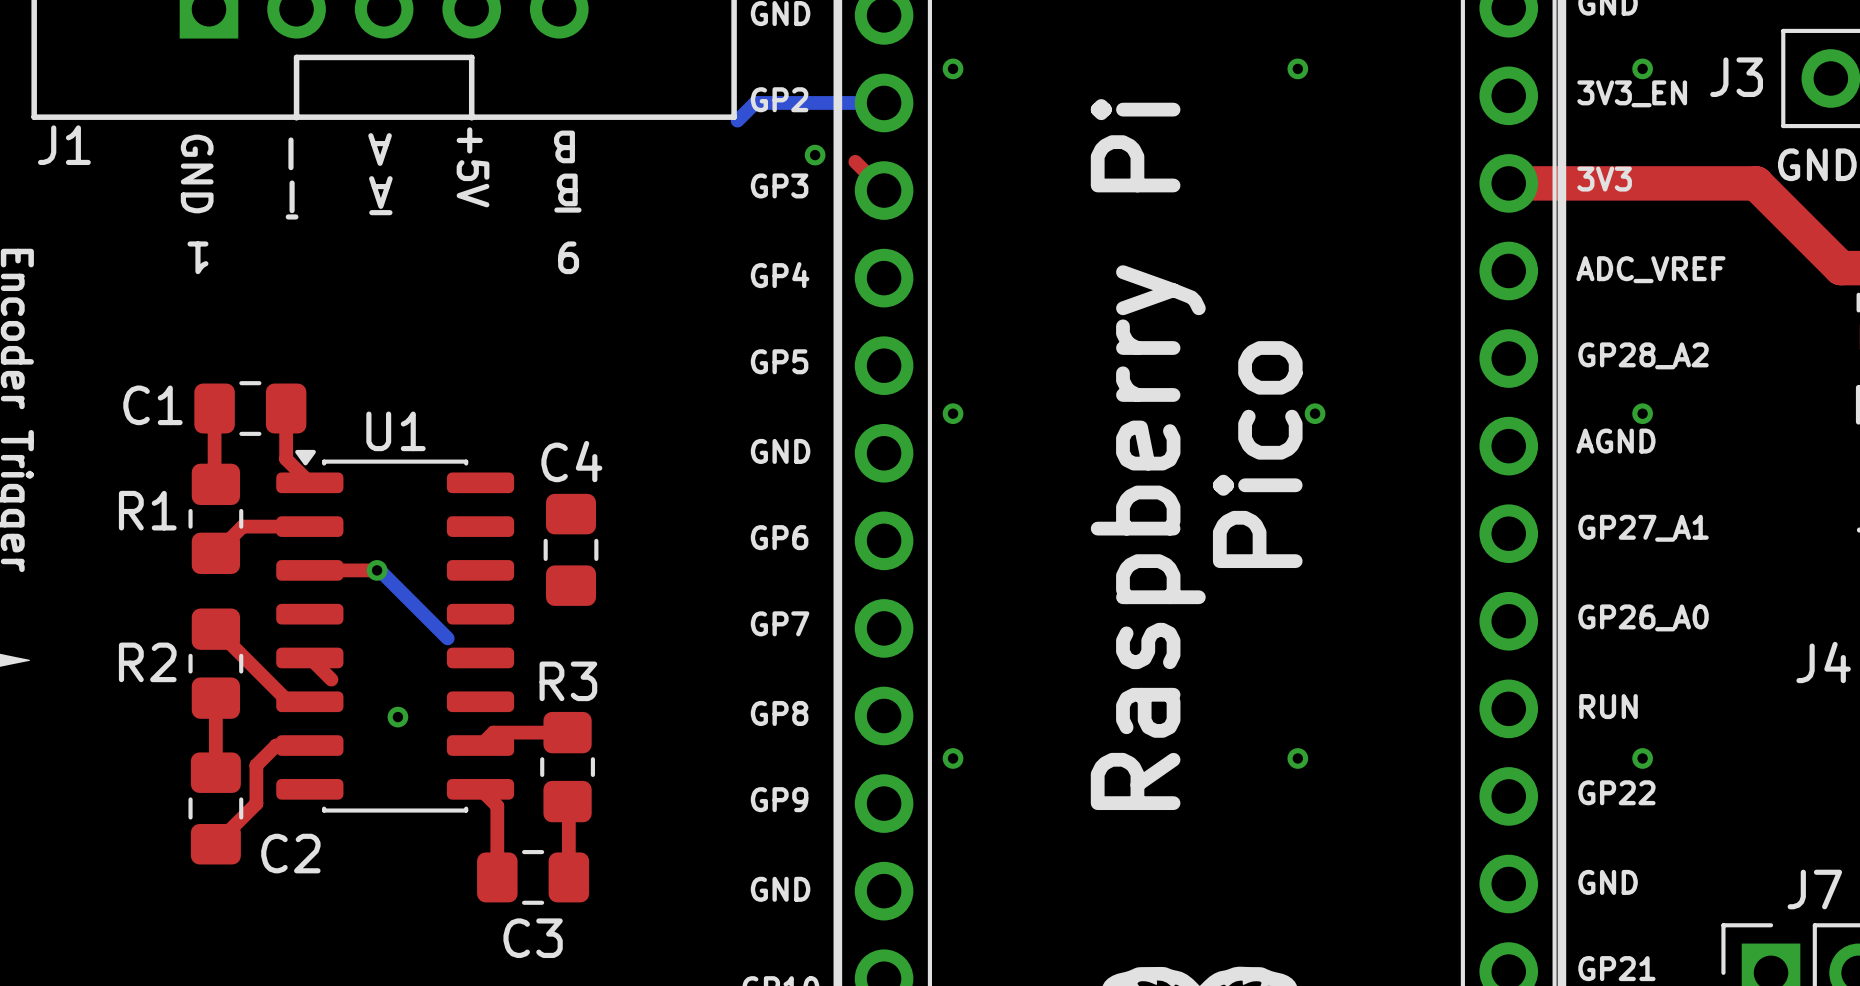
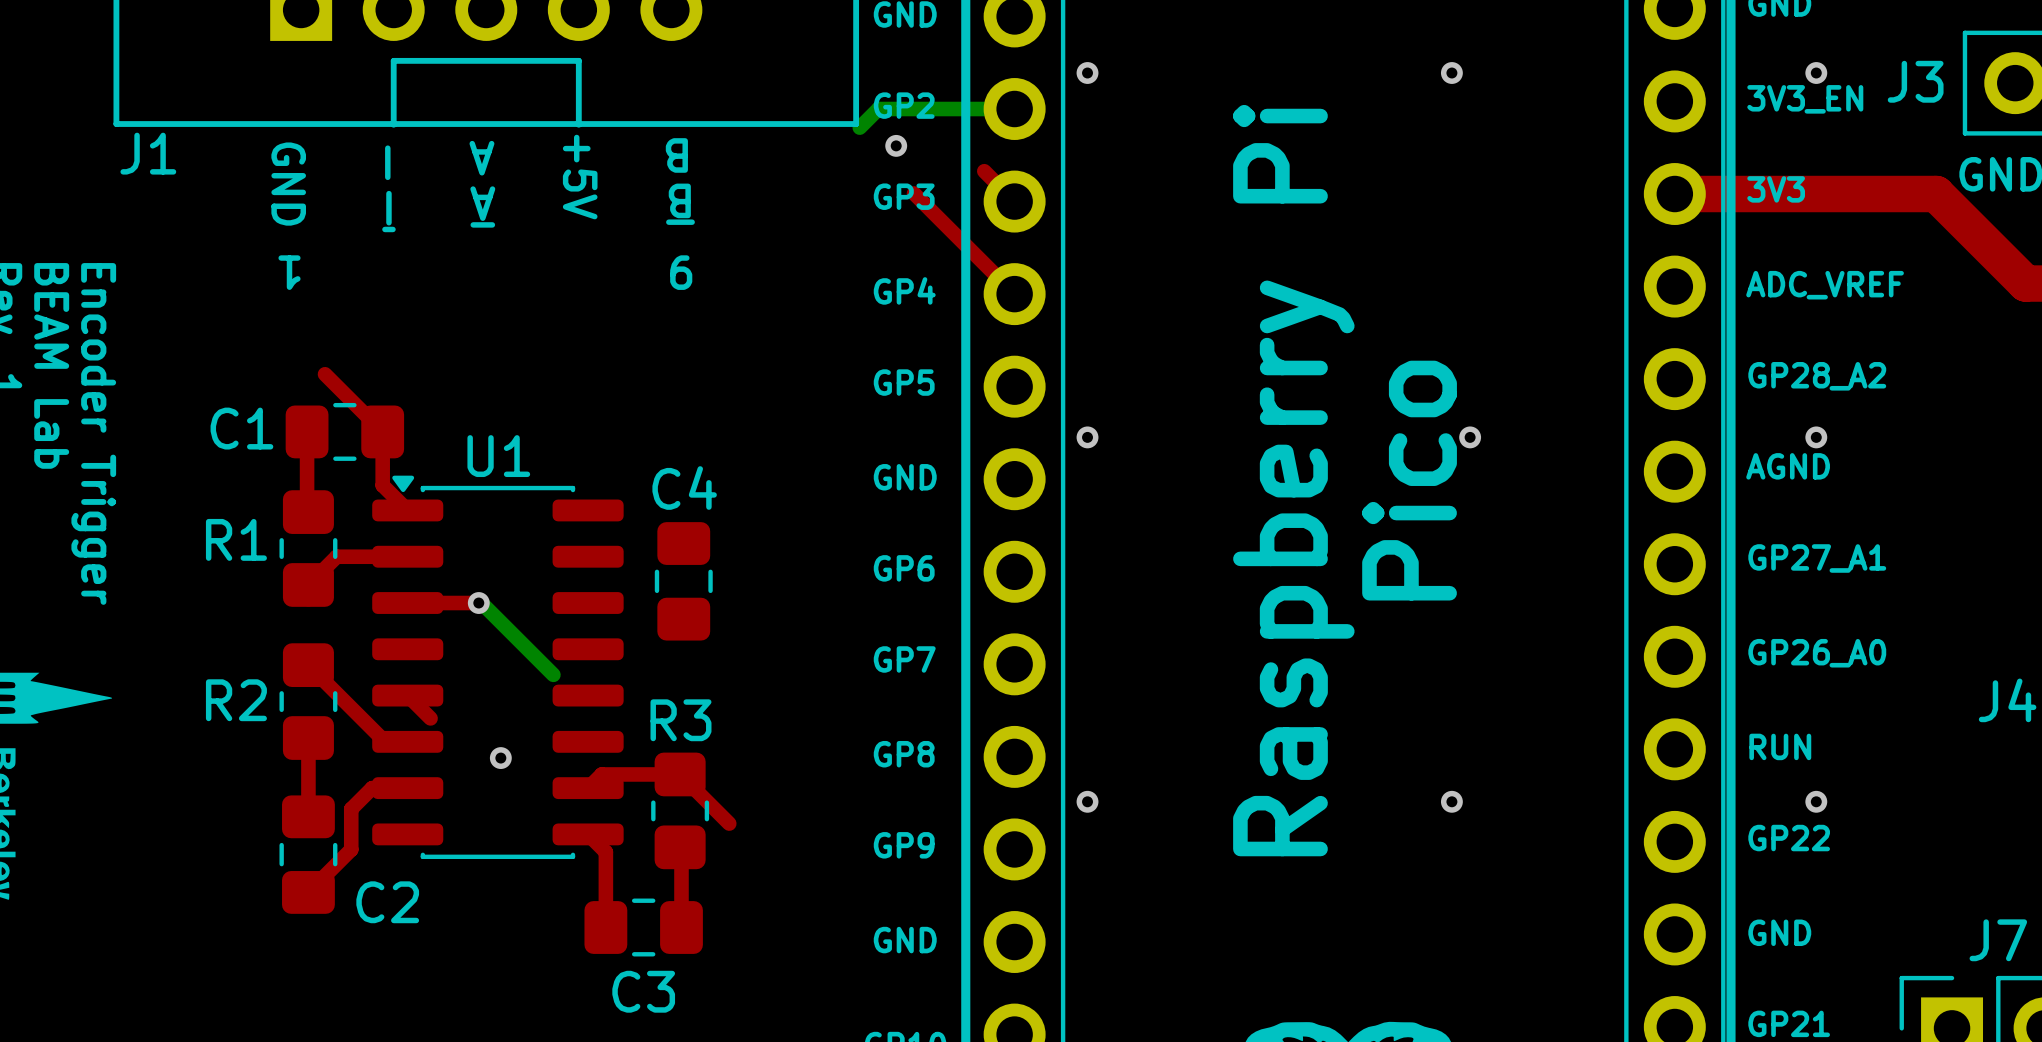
via position: (815, 155) -> (896, 145)
top track: none -> (913, 193) (1014, 294)
top track: none -> (325, 374) (382, 431)
top track: none -> (680, 774) (729, 823)

